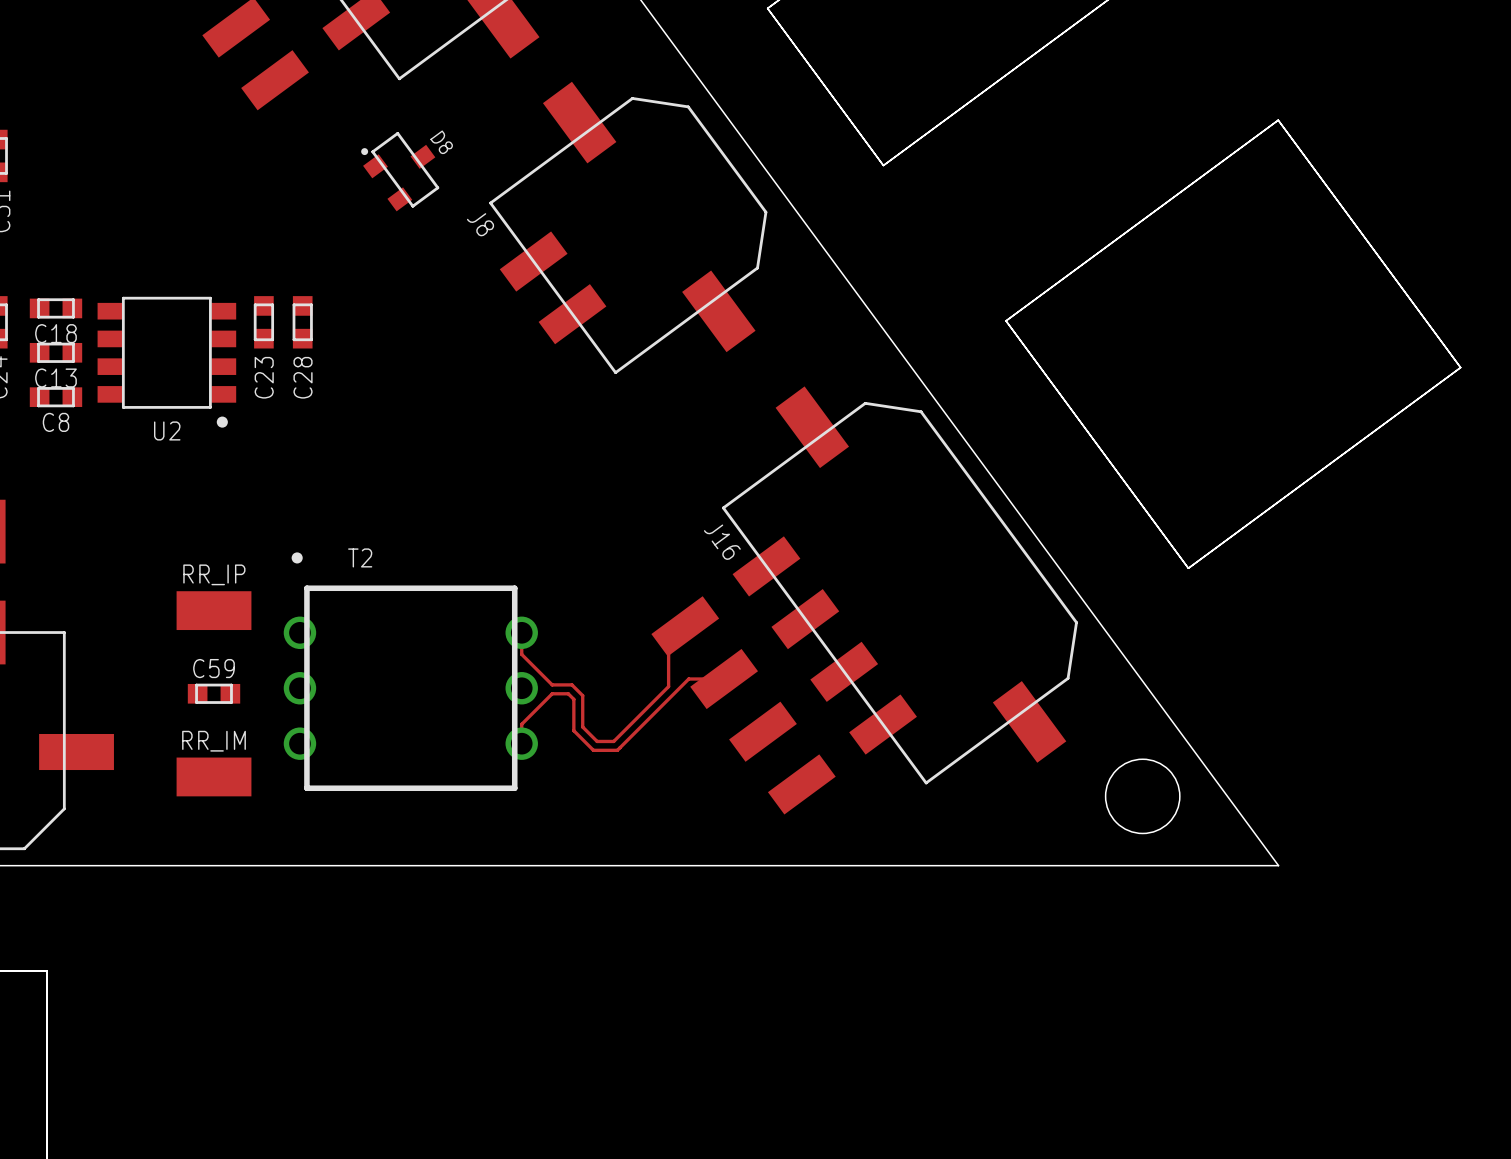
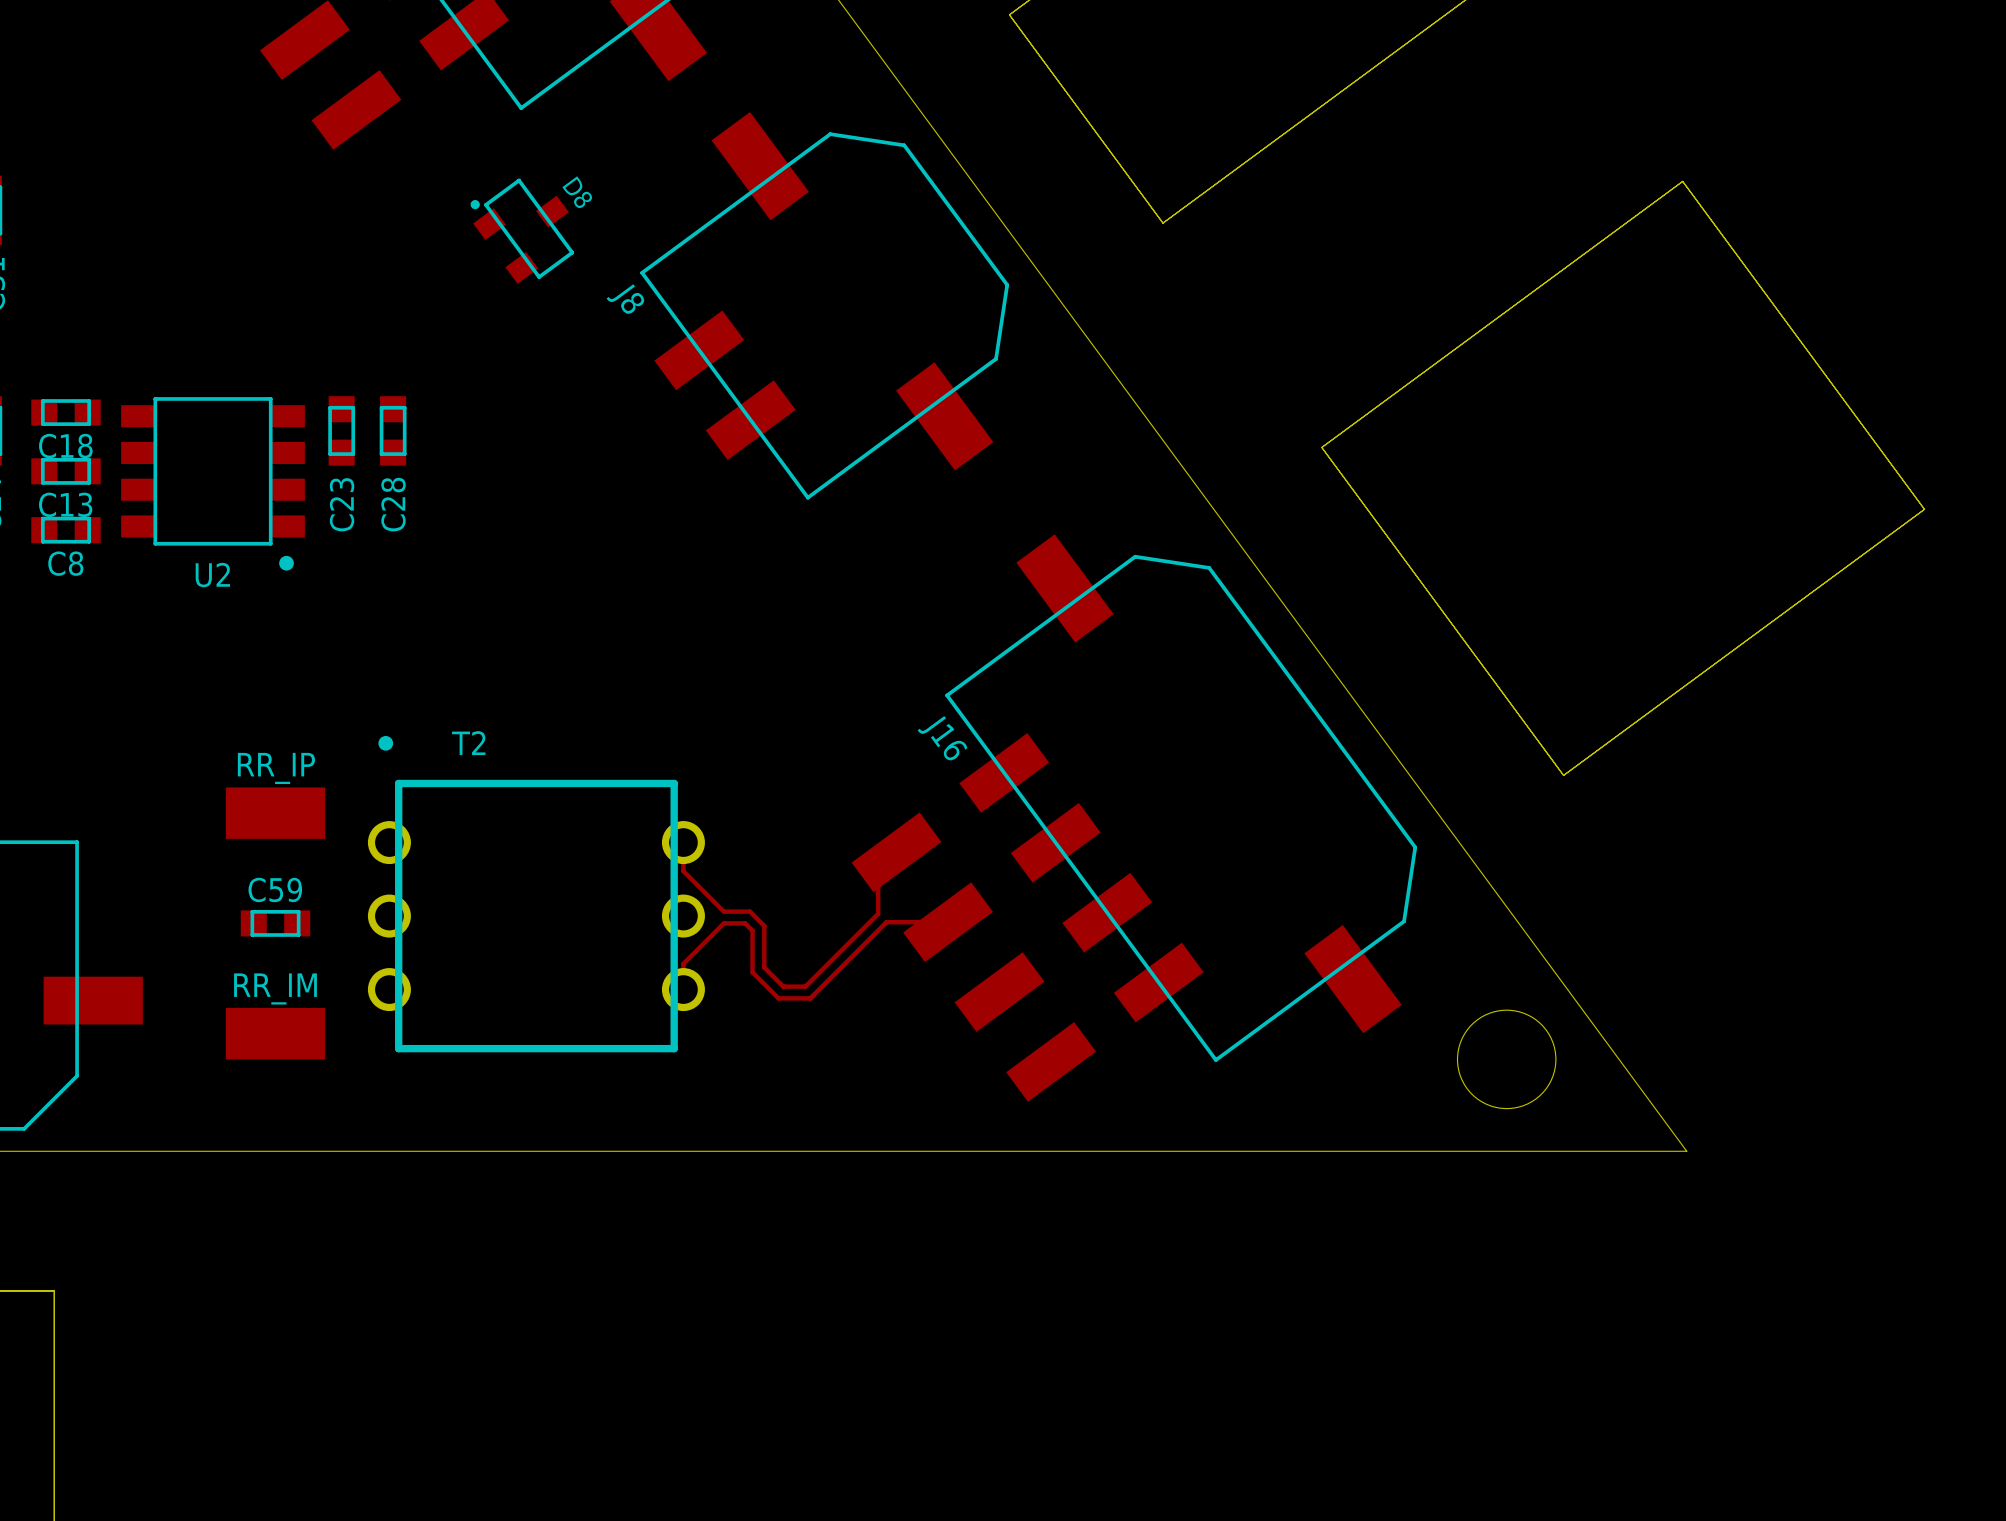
J16 position: (1056, 467) -> (1388, 641)
track: (720, 679) (724, 679) (688, 679) (674, 692) -> (946, 923) (948, 922) (886, 922)

